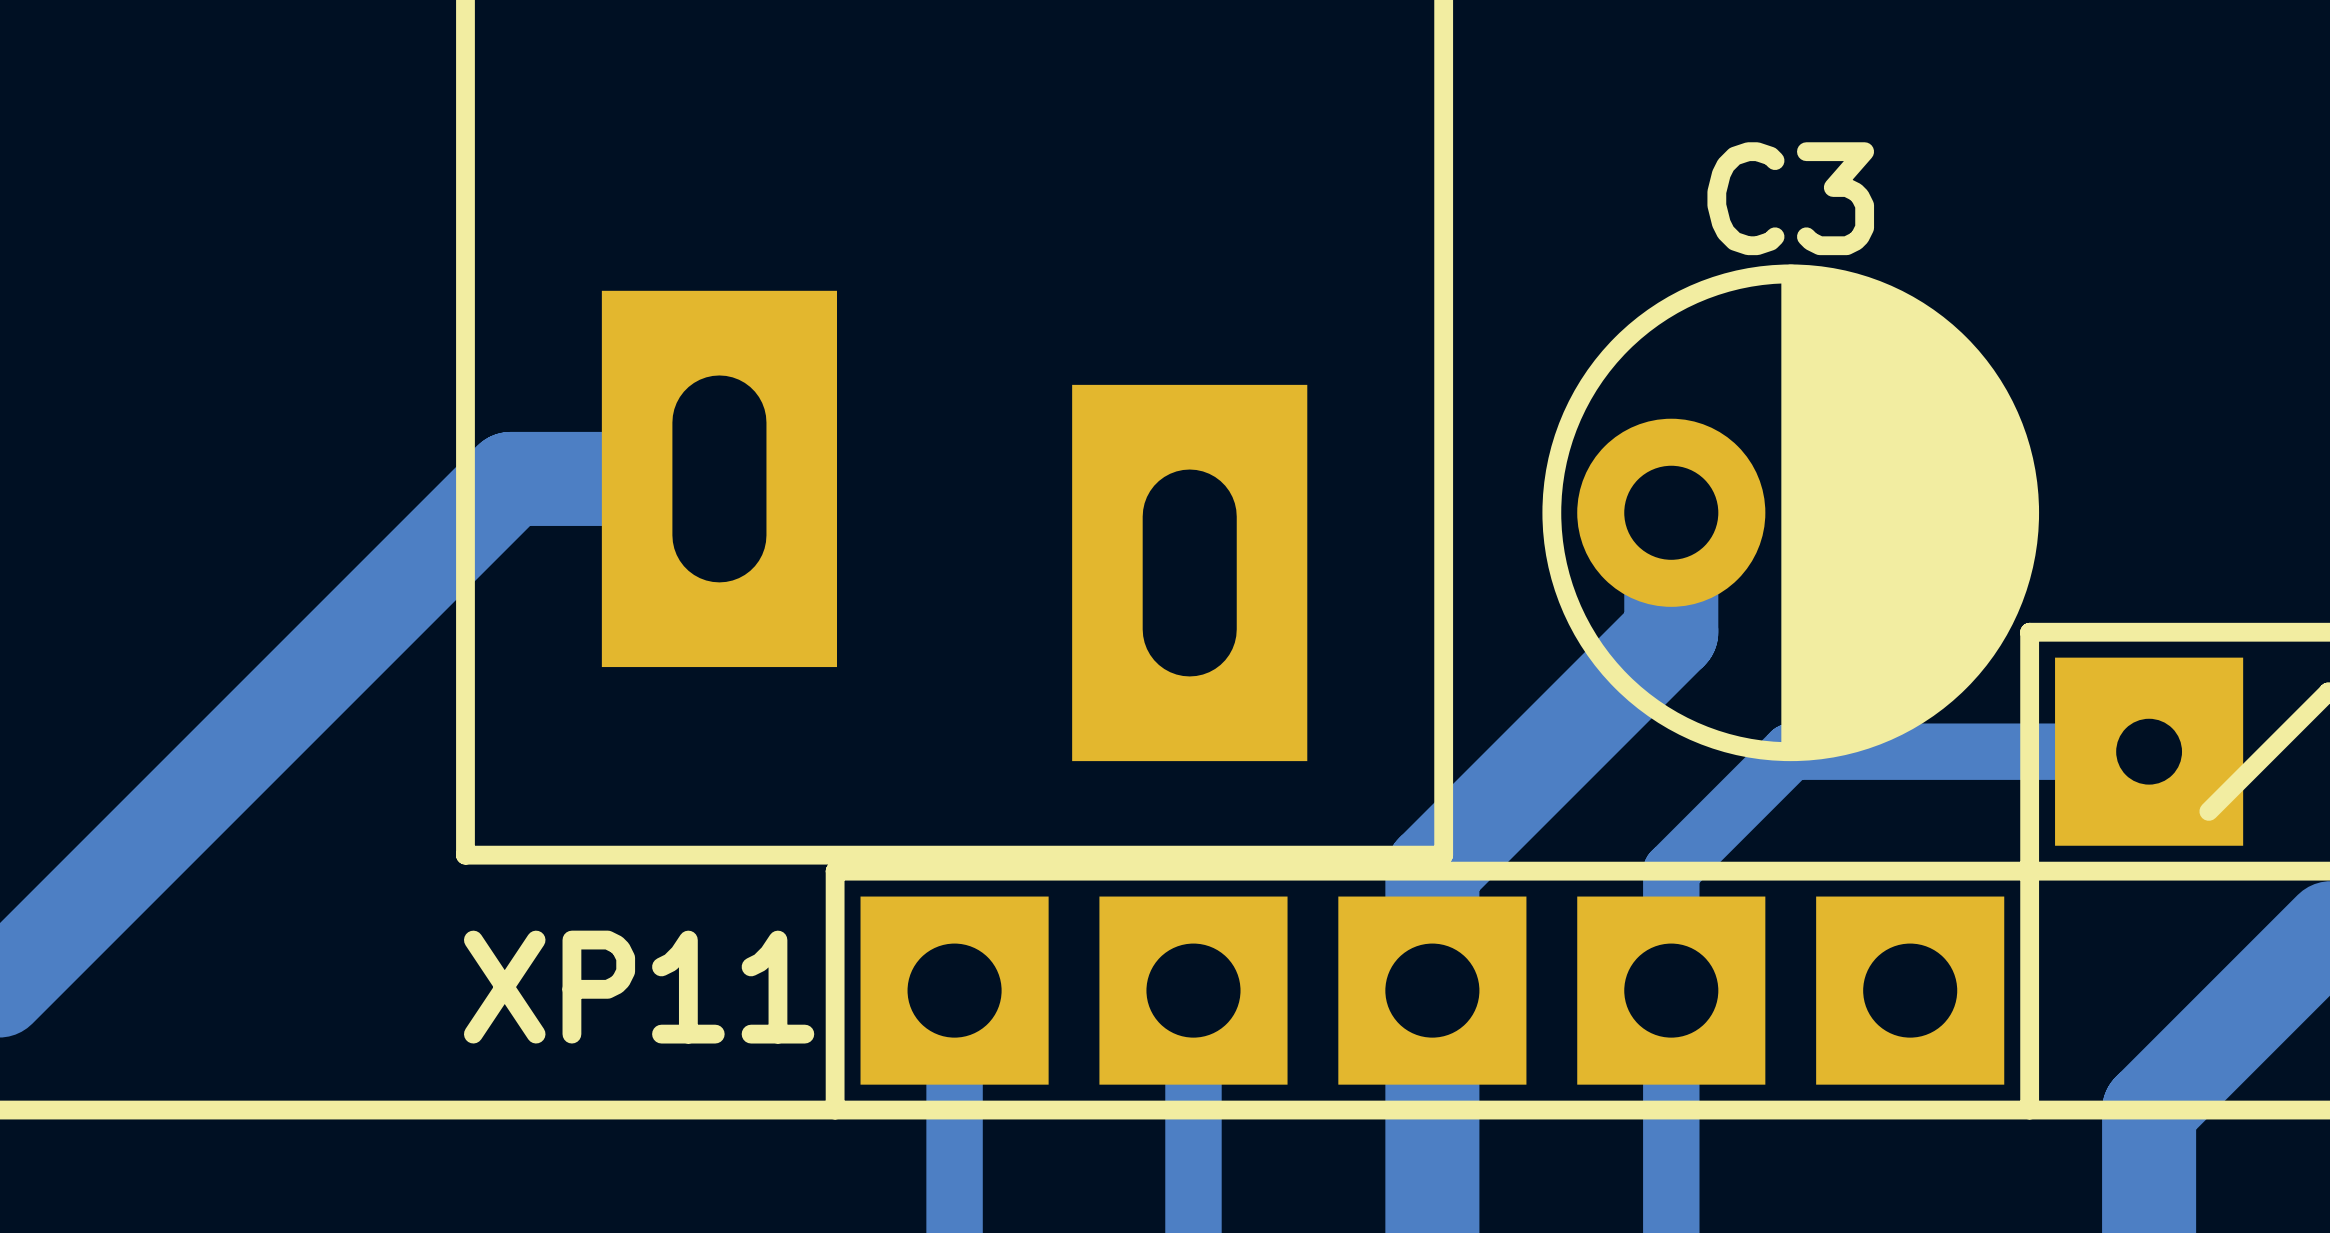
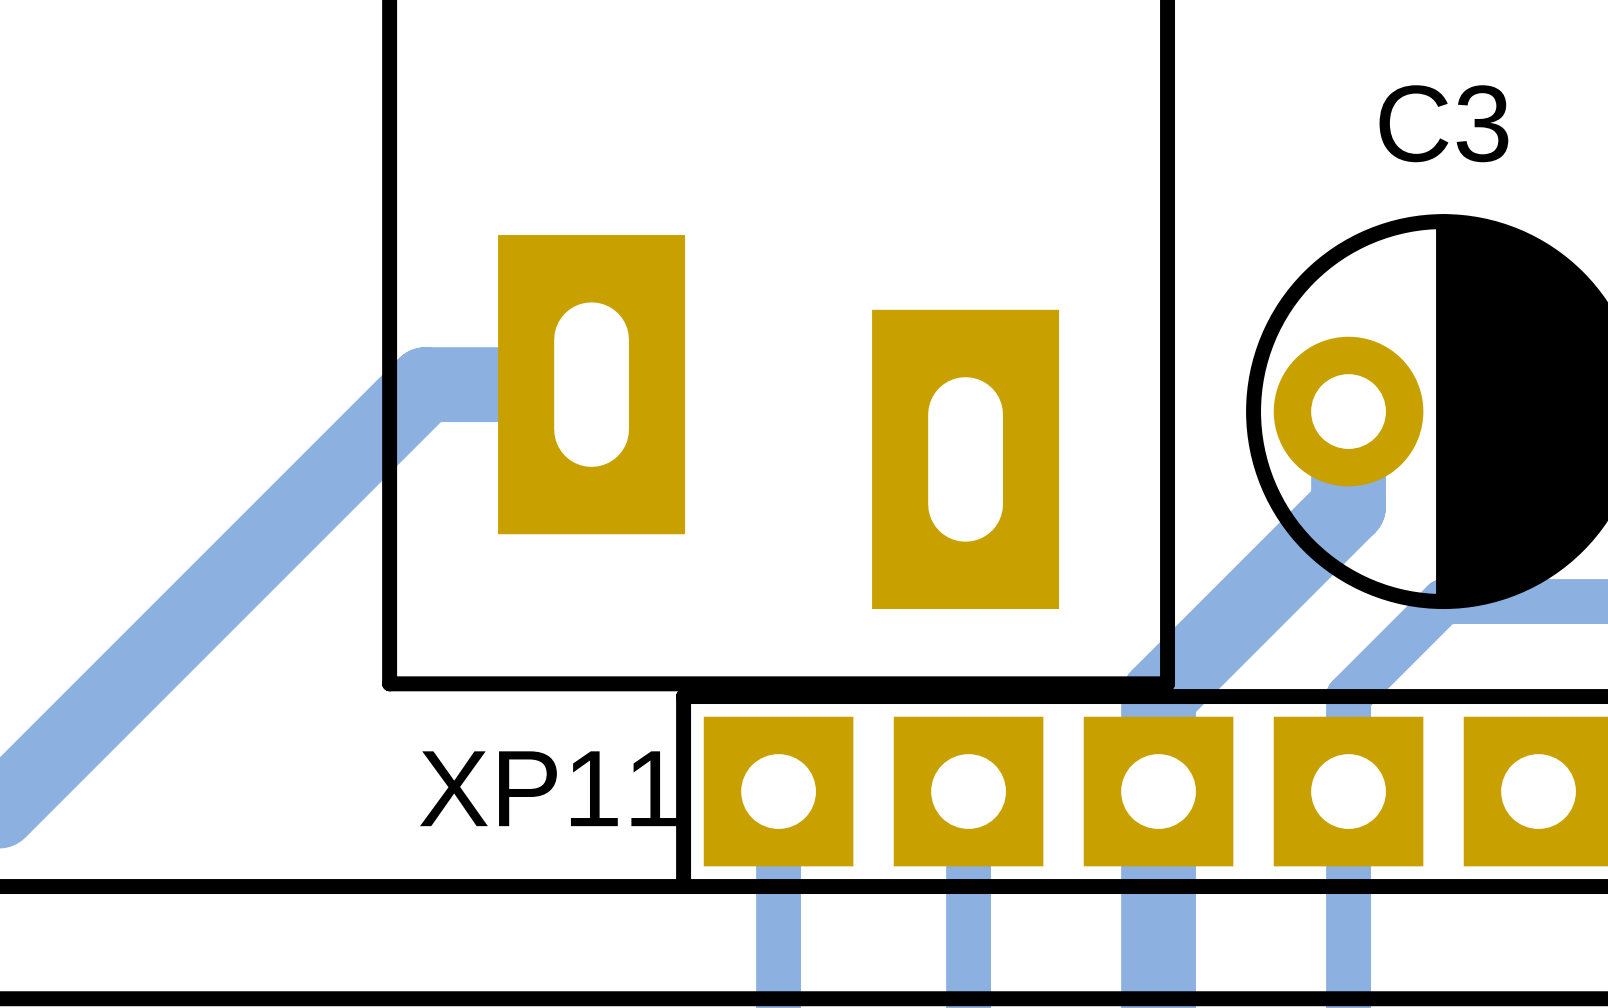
C3 name position: C3 (1790, 198) -> C3 (1443, 123)

